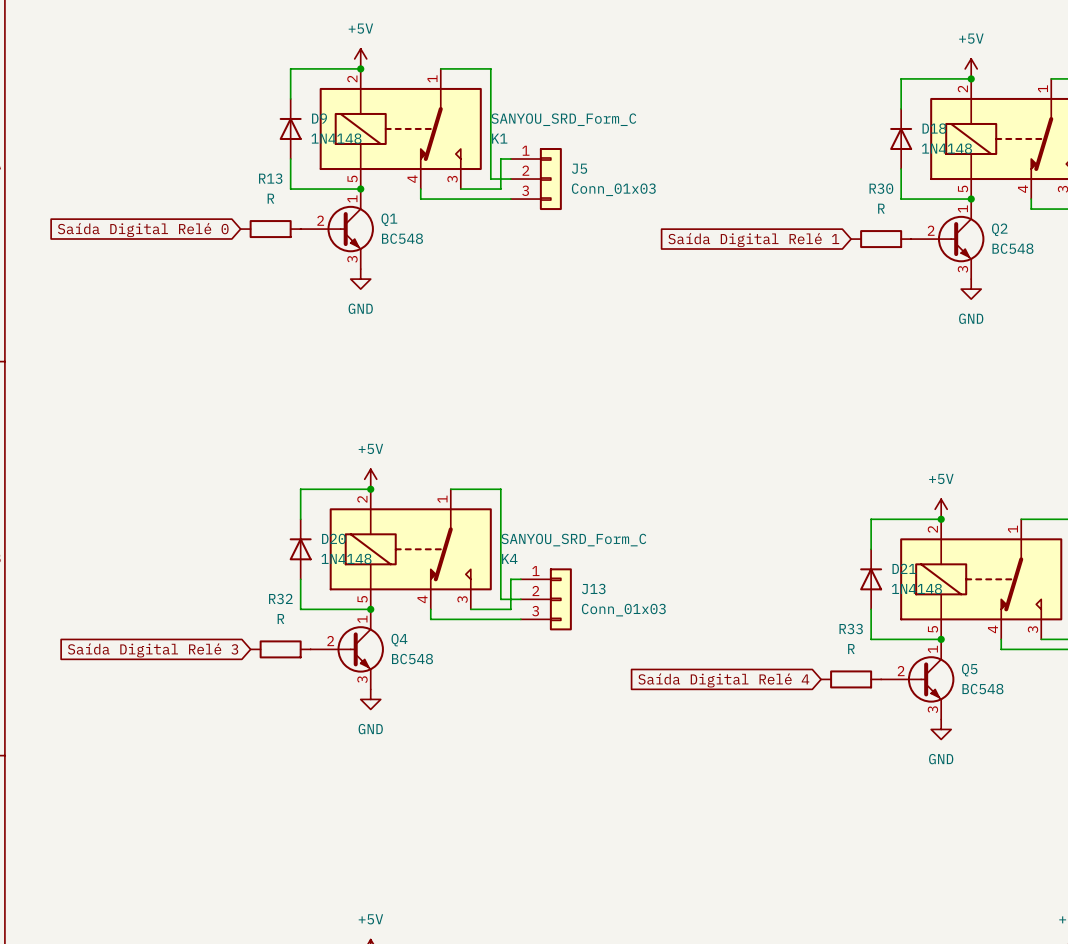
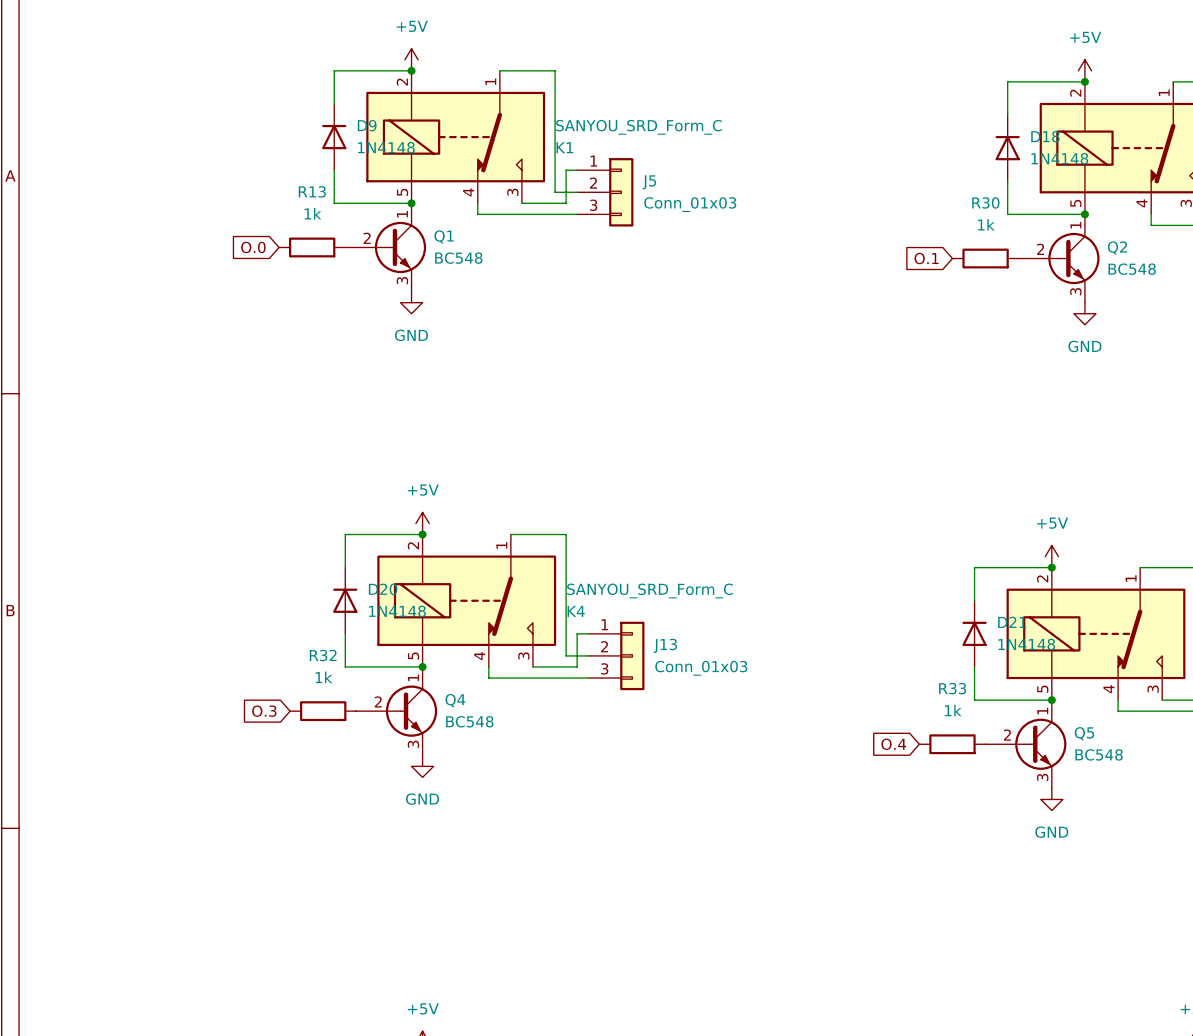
R13 value: R (270, 198) -> 1k (312, 213)
R30 value: R (881, 208) -> 1k (986, 224)
global label: Saída Digital Relé 0 (143, 230) -> O.0 (253, 247)
global label: Saída Digital Relé 1 (753, 240) -> O.1 (926, 258)
R32 value: R (280, 618) -> 1k (324, 677)
R33 value: R (851, 649) -> 1k (953, 710)
global label: Saída Digital Relé 3 (153, 650) -> O.3 (264, 711)
global label: Saída Digital Relé 4 (723, 680) -> O.4 (893, 744)

